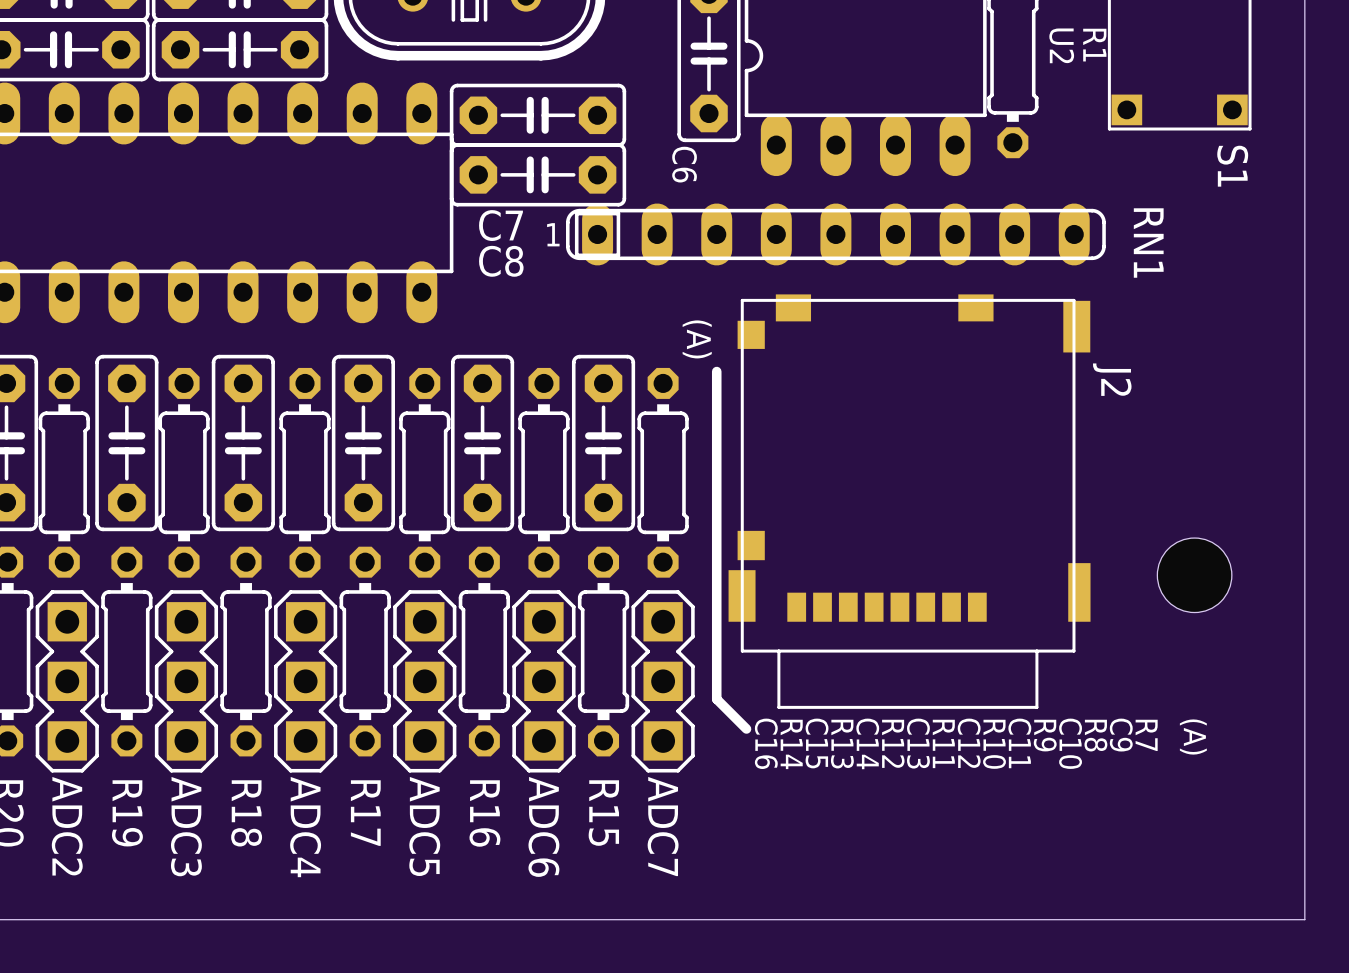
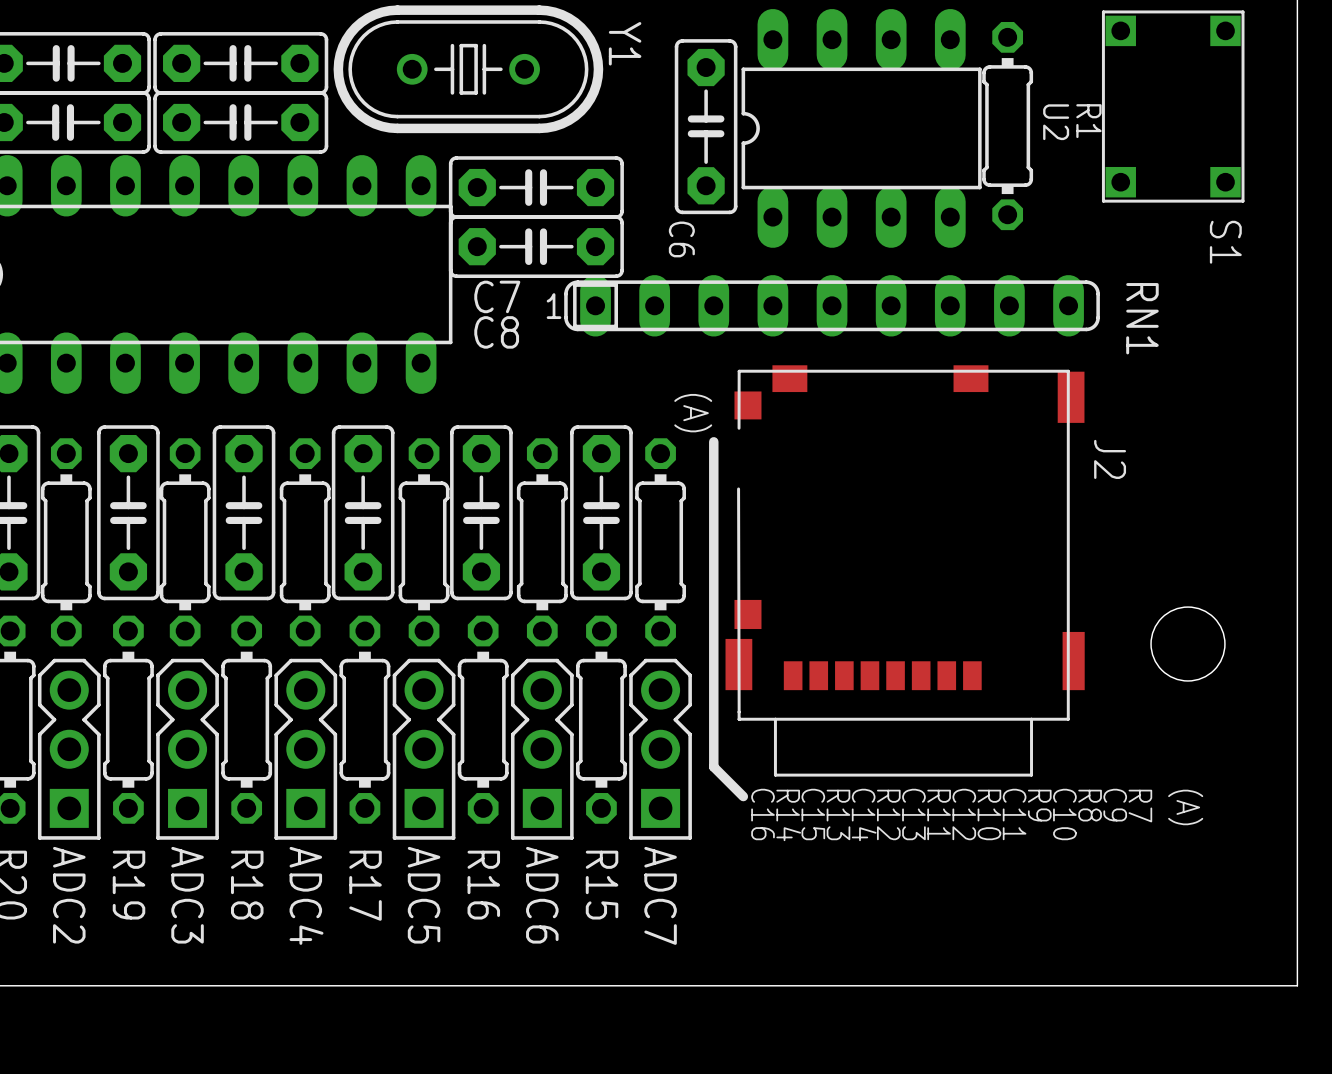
J2 footprint: [728, 294, 1091, 709] -> [725, 365, 1085, 777]
ADC2 footprint: [35, 590, 99, 773] -> [37, 658, 101, 840]
ADC3 footprint: [154, 590, 219, 773] -> [156, 658, 219, 840]
ADC4 footprint: [274, 590, 338, 773] -> [274, 658, 338, 840]
ADC5 footprint: [393, 590, 457, 773] -> [392, 658, 456, 840]
ADC6 footprint: [512, 590, 576, 773] -> [510, 658, 574, 840]
ADC7 footprint: [631, 590, 695, 773] -> [629, 658, 692, 840]

